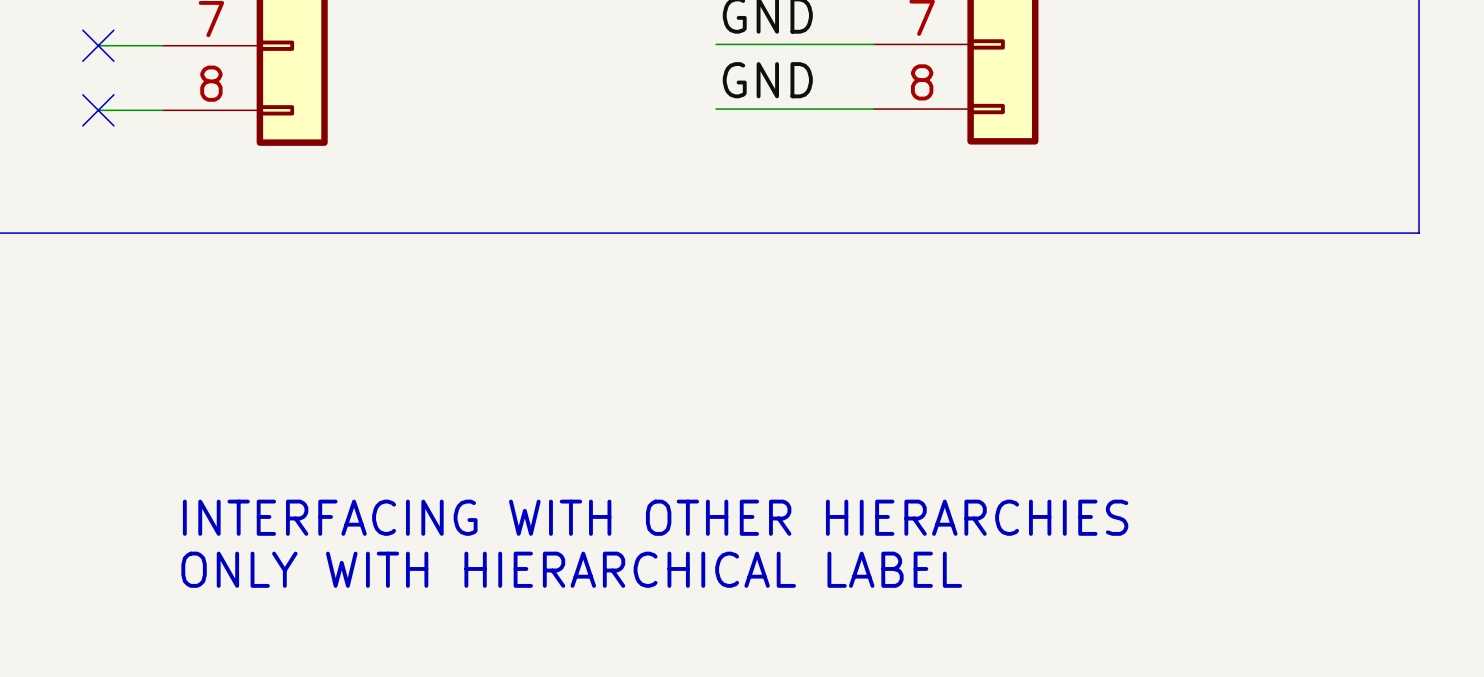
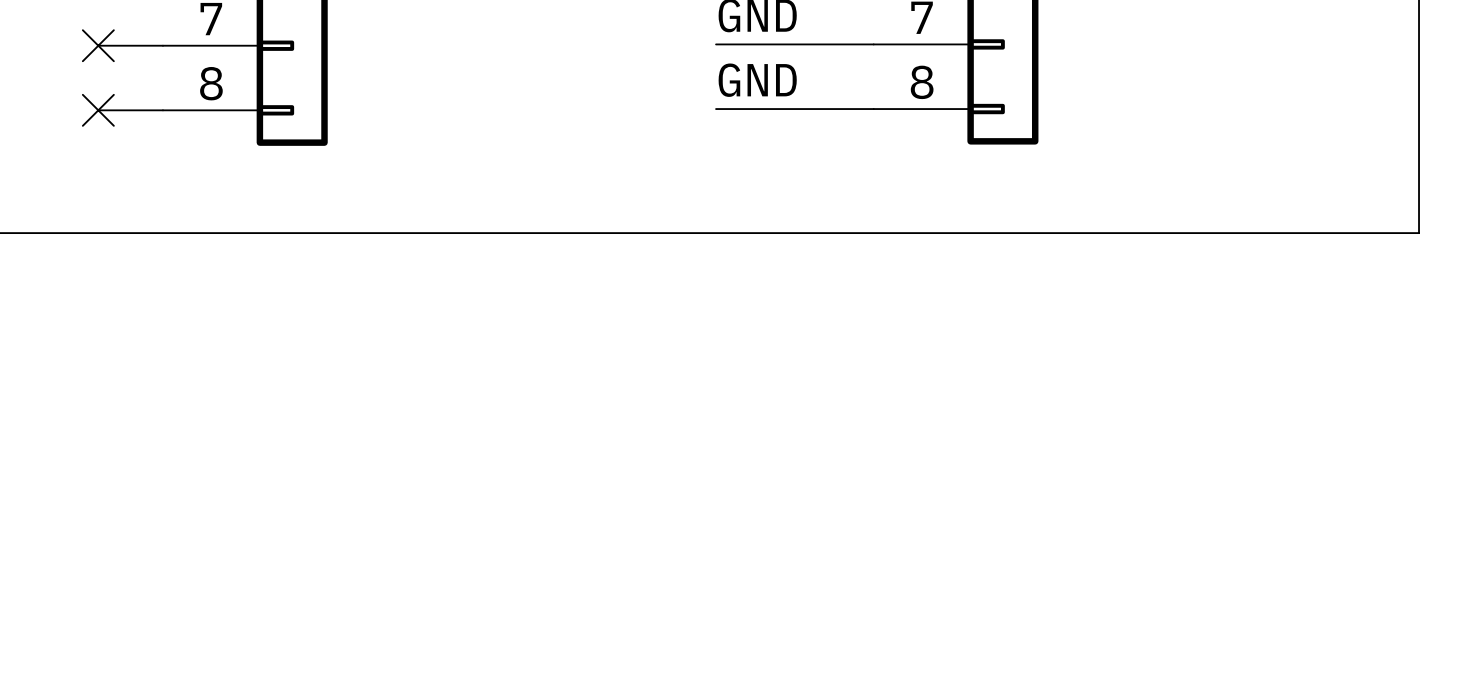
text: INTERFACING WITH OTHER HIERARCHIES (655, 517) -> none
text: ONLY WITH HIERARCHICAL LABEL (571, 569) -> none

